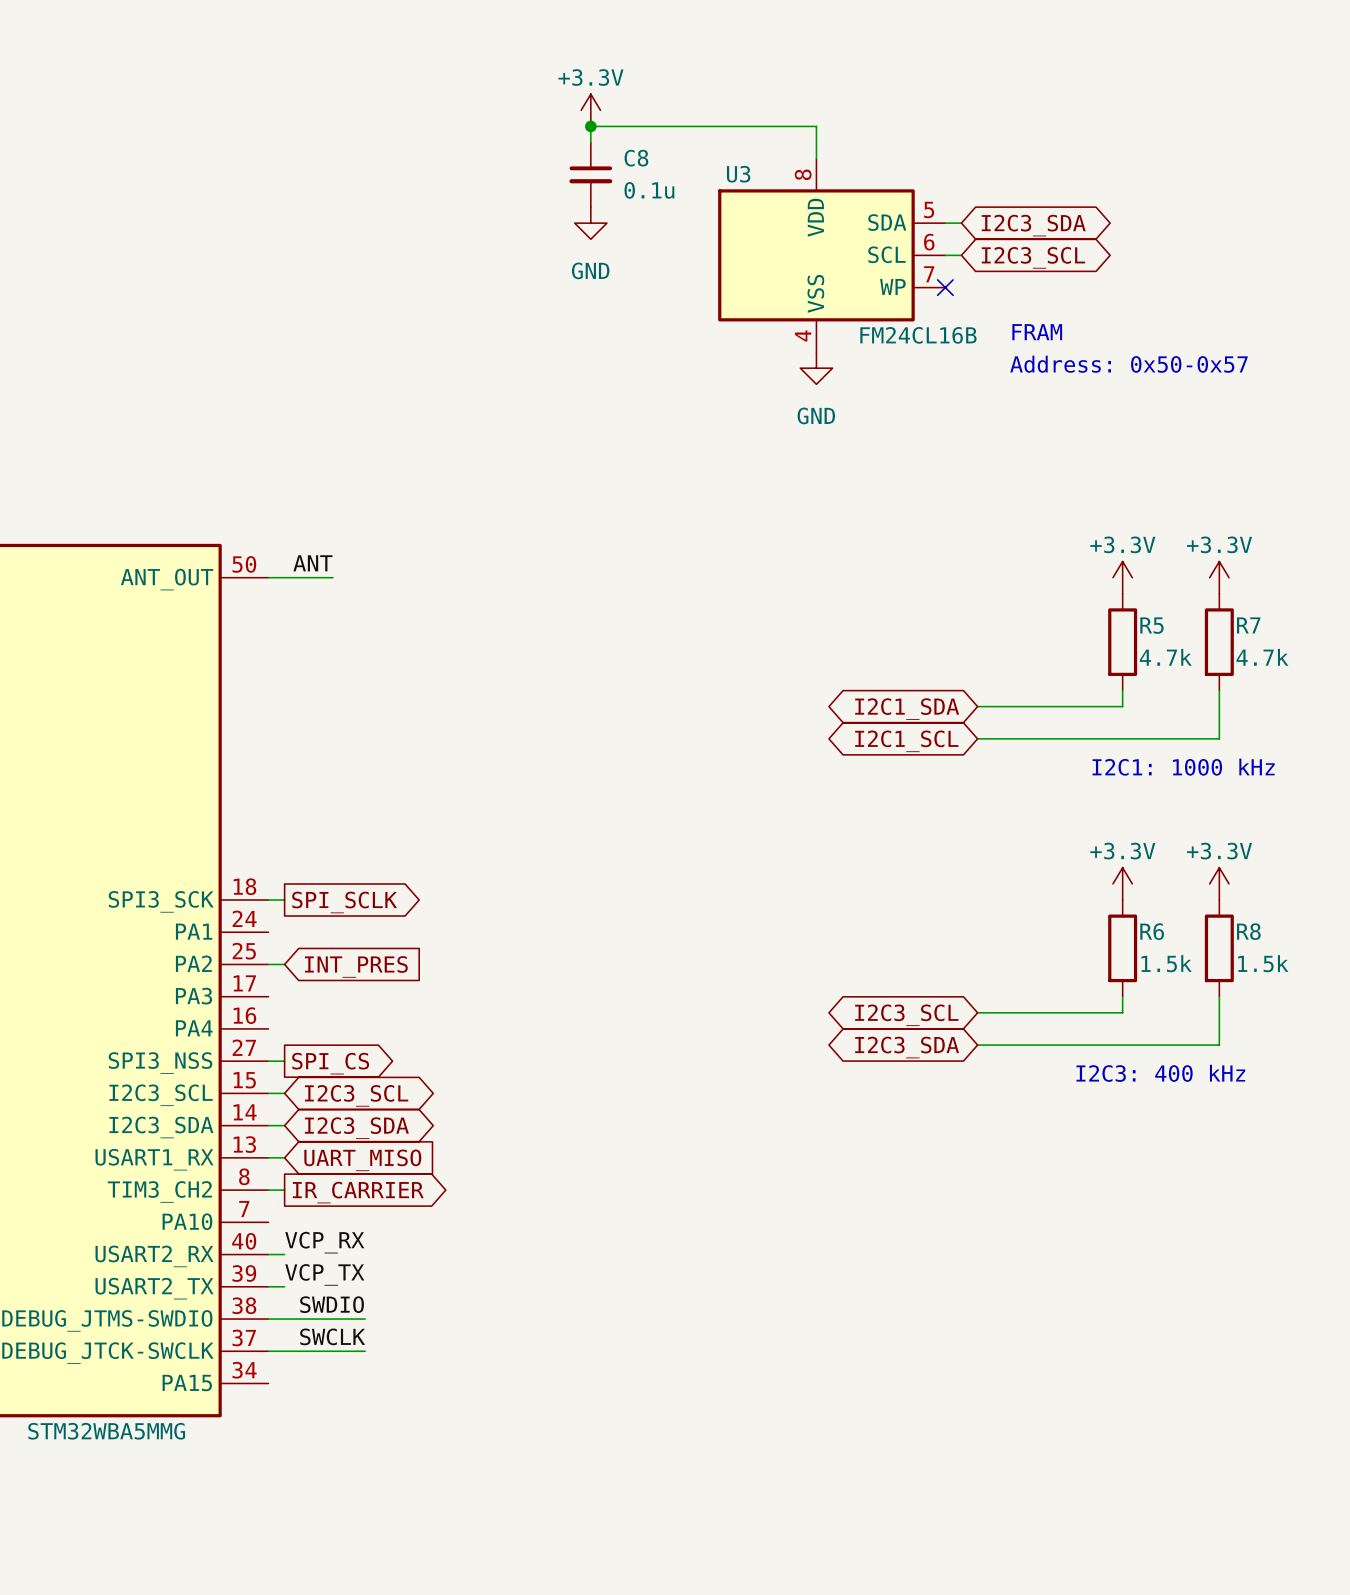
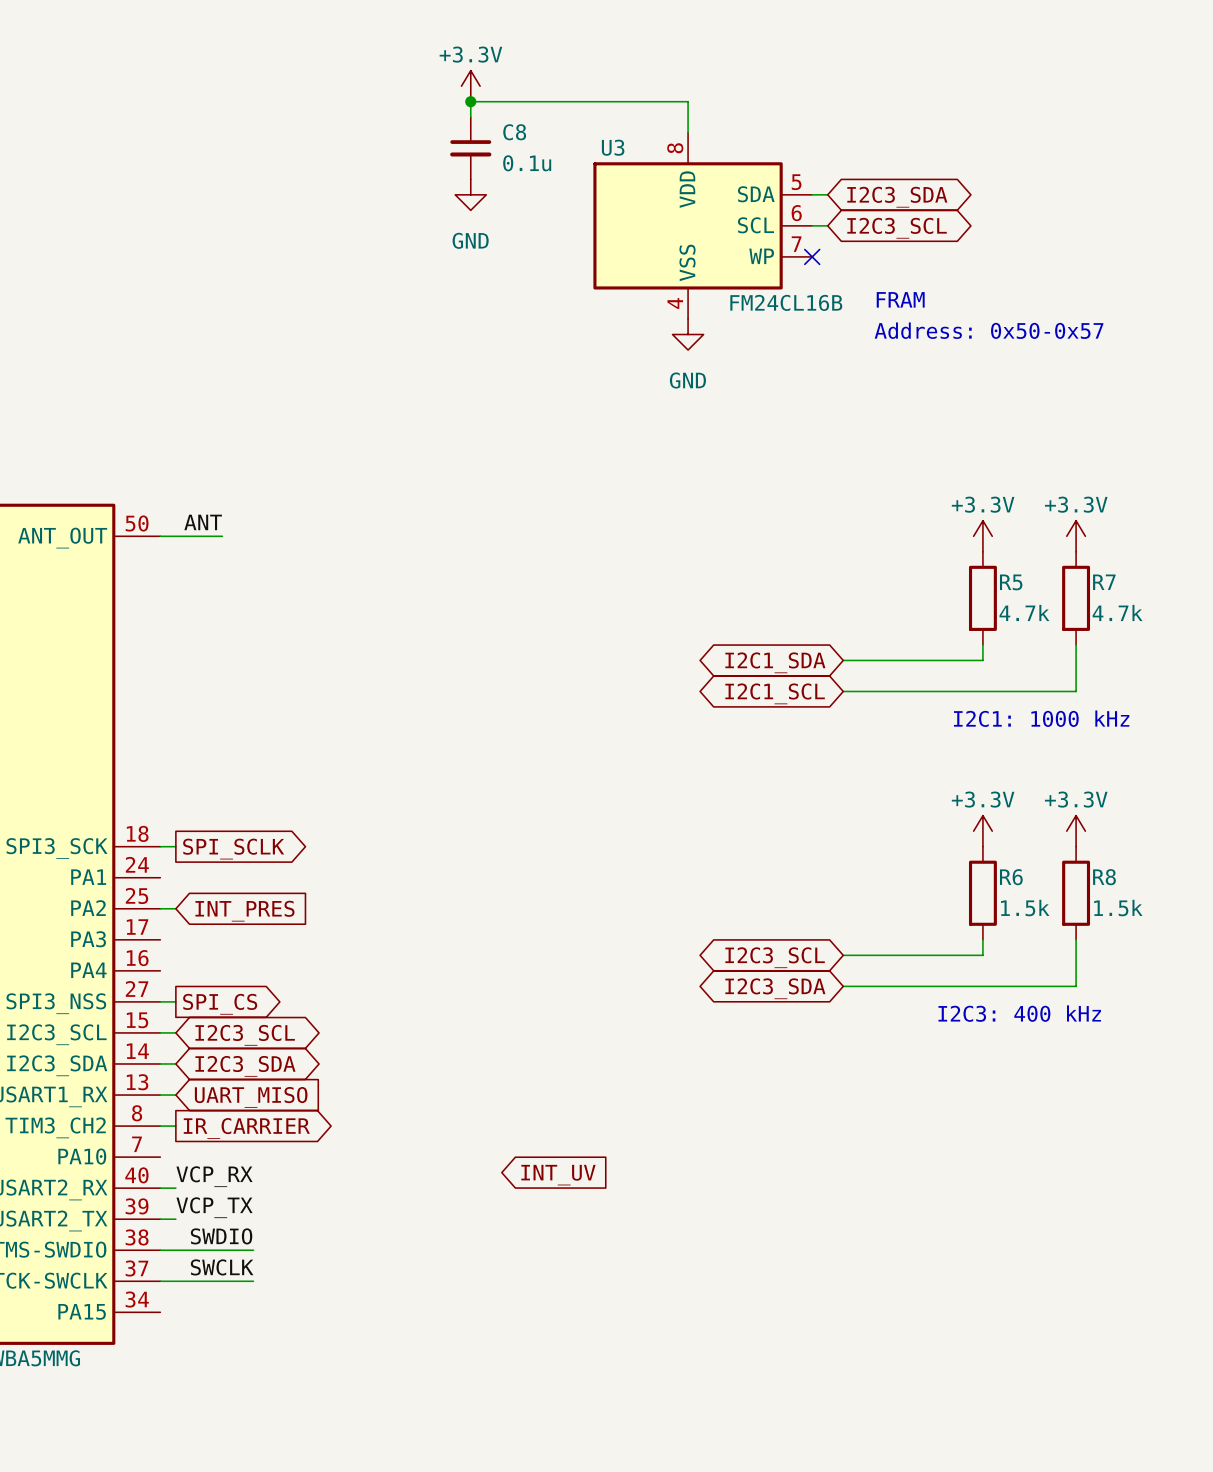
global label: none -> INT_UV (558, 1175)

